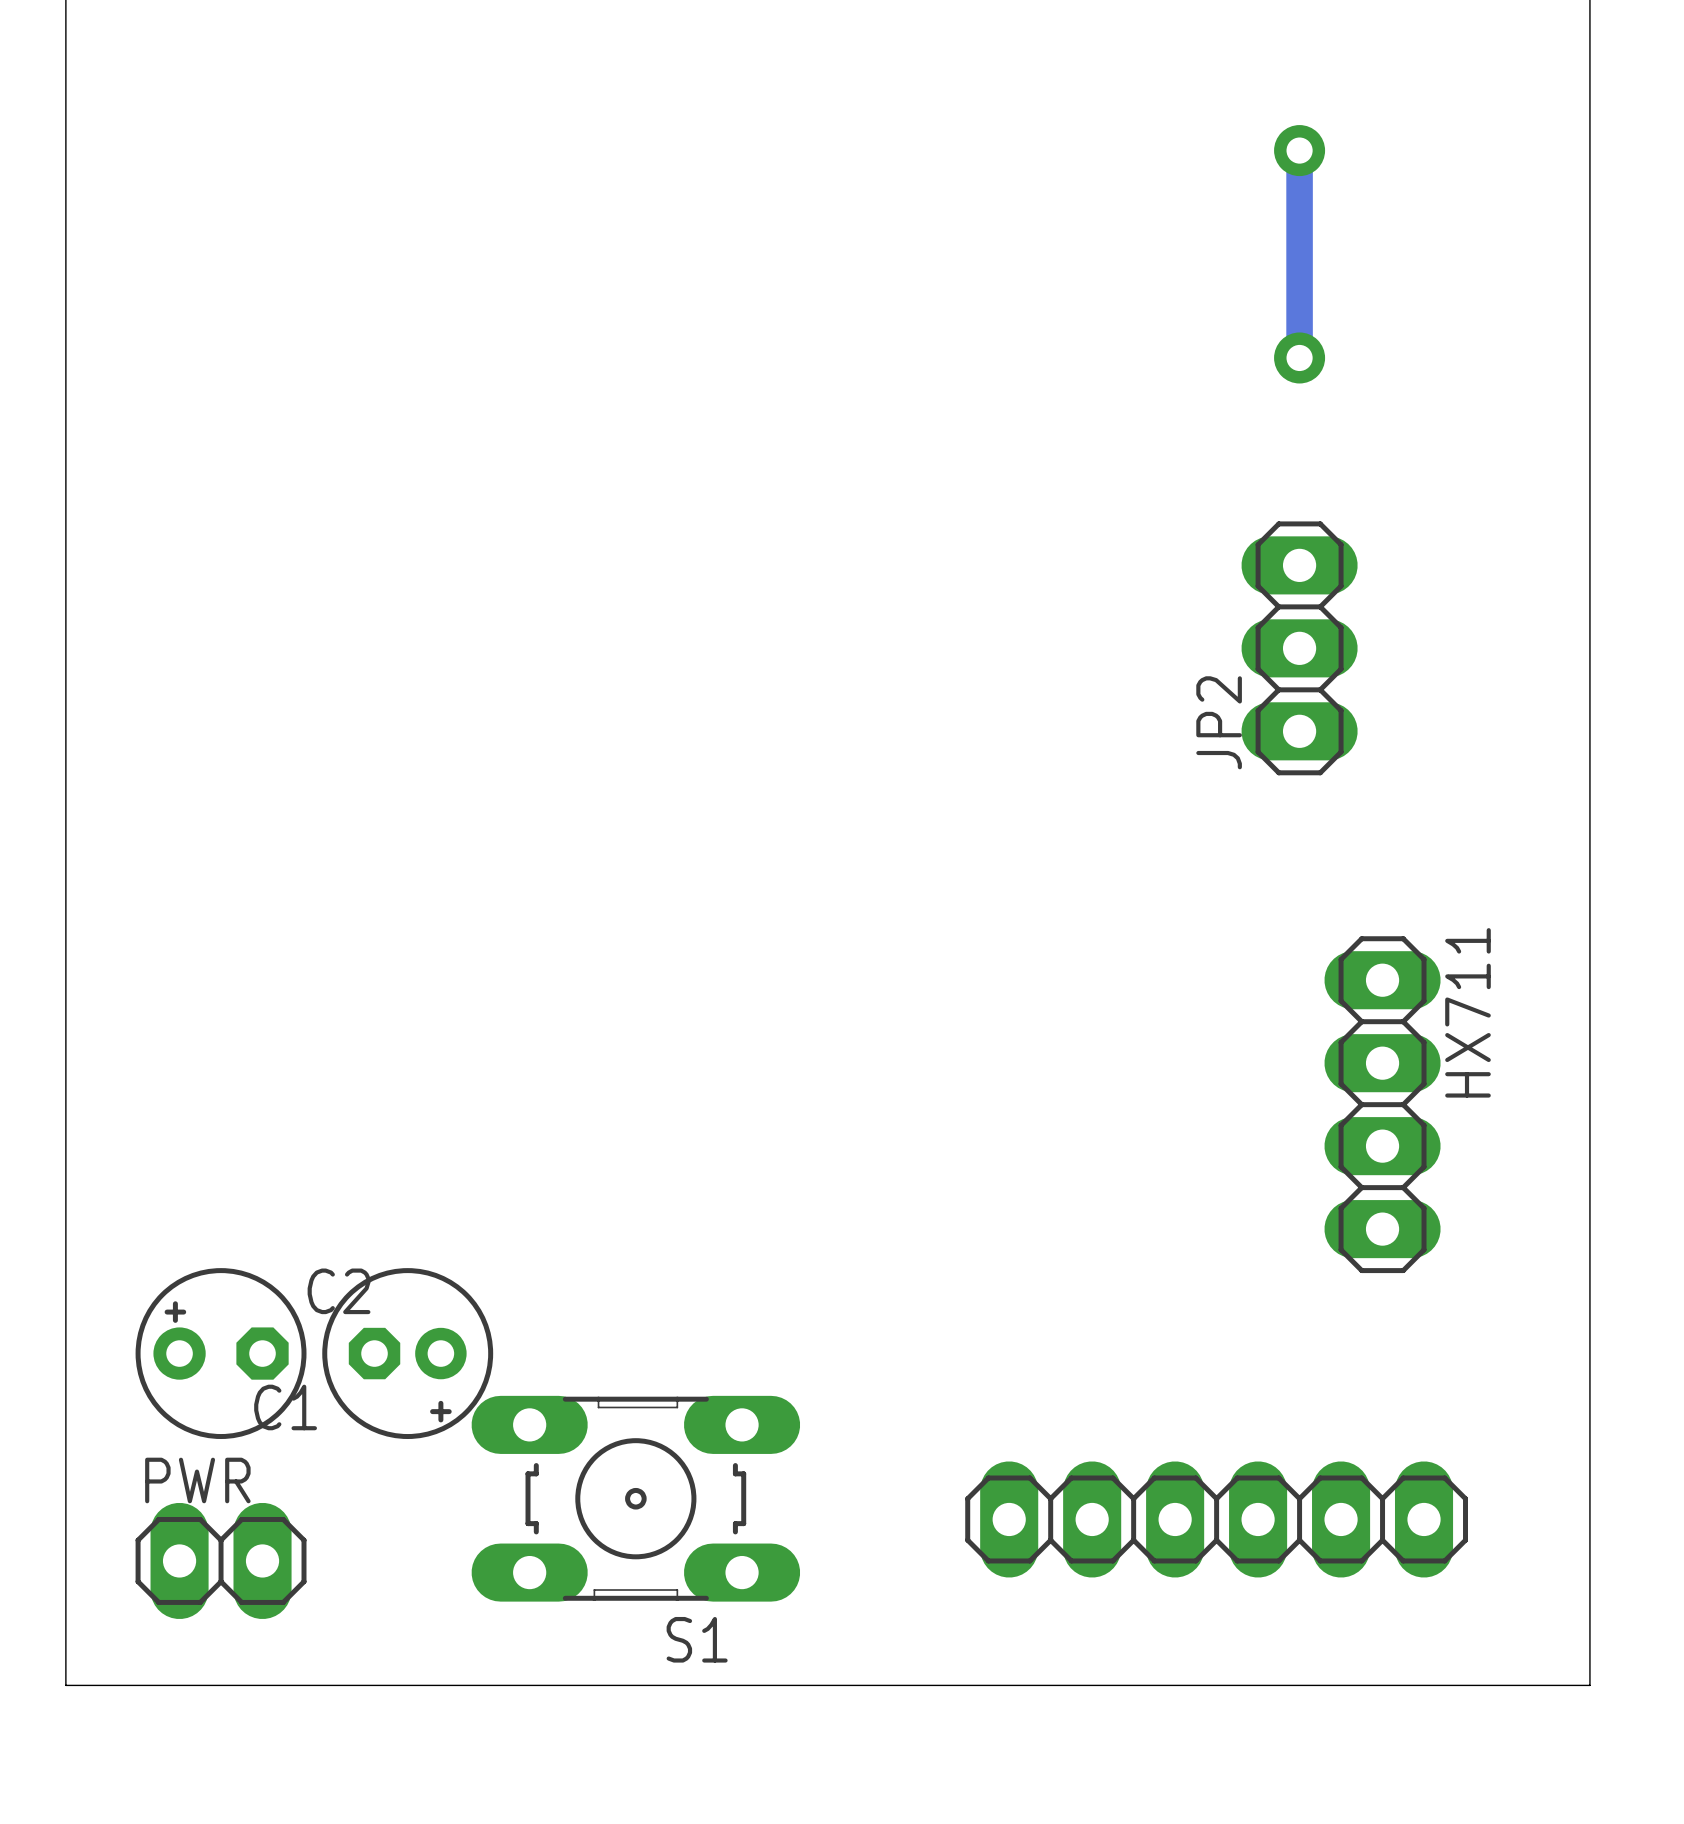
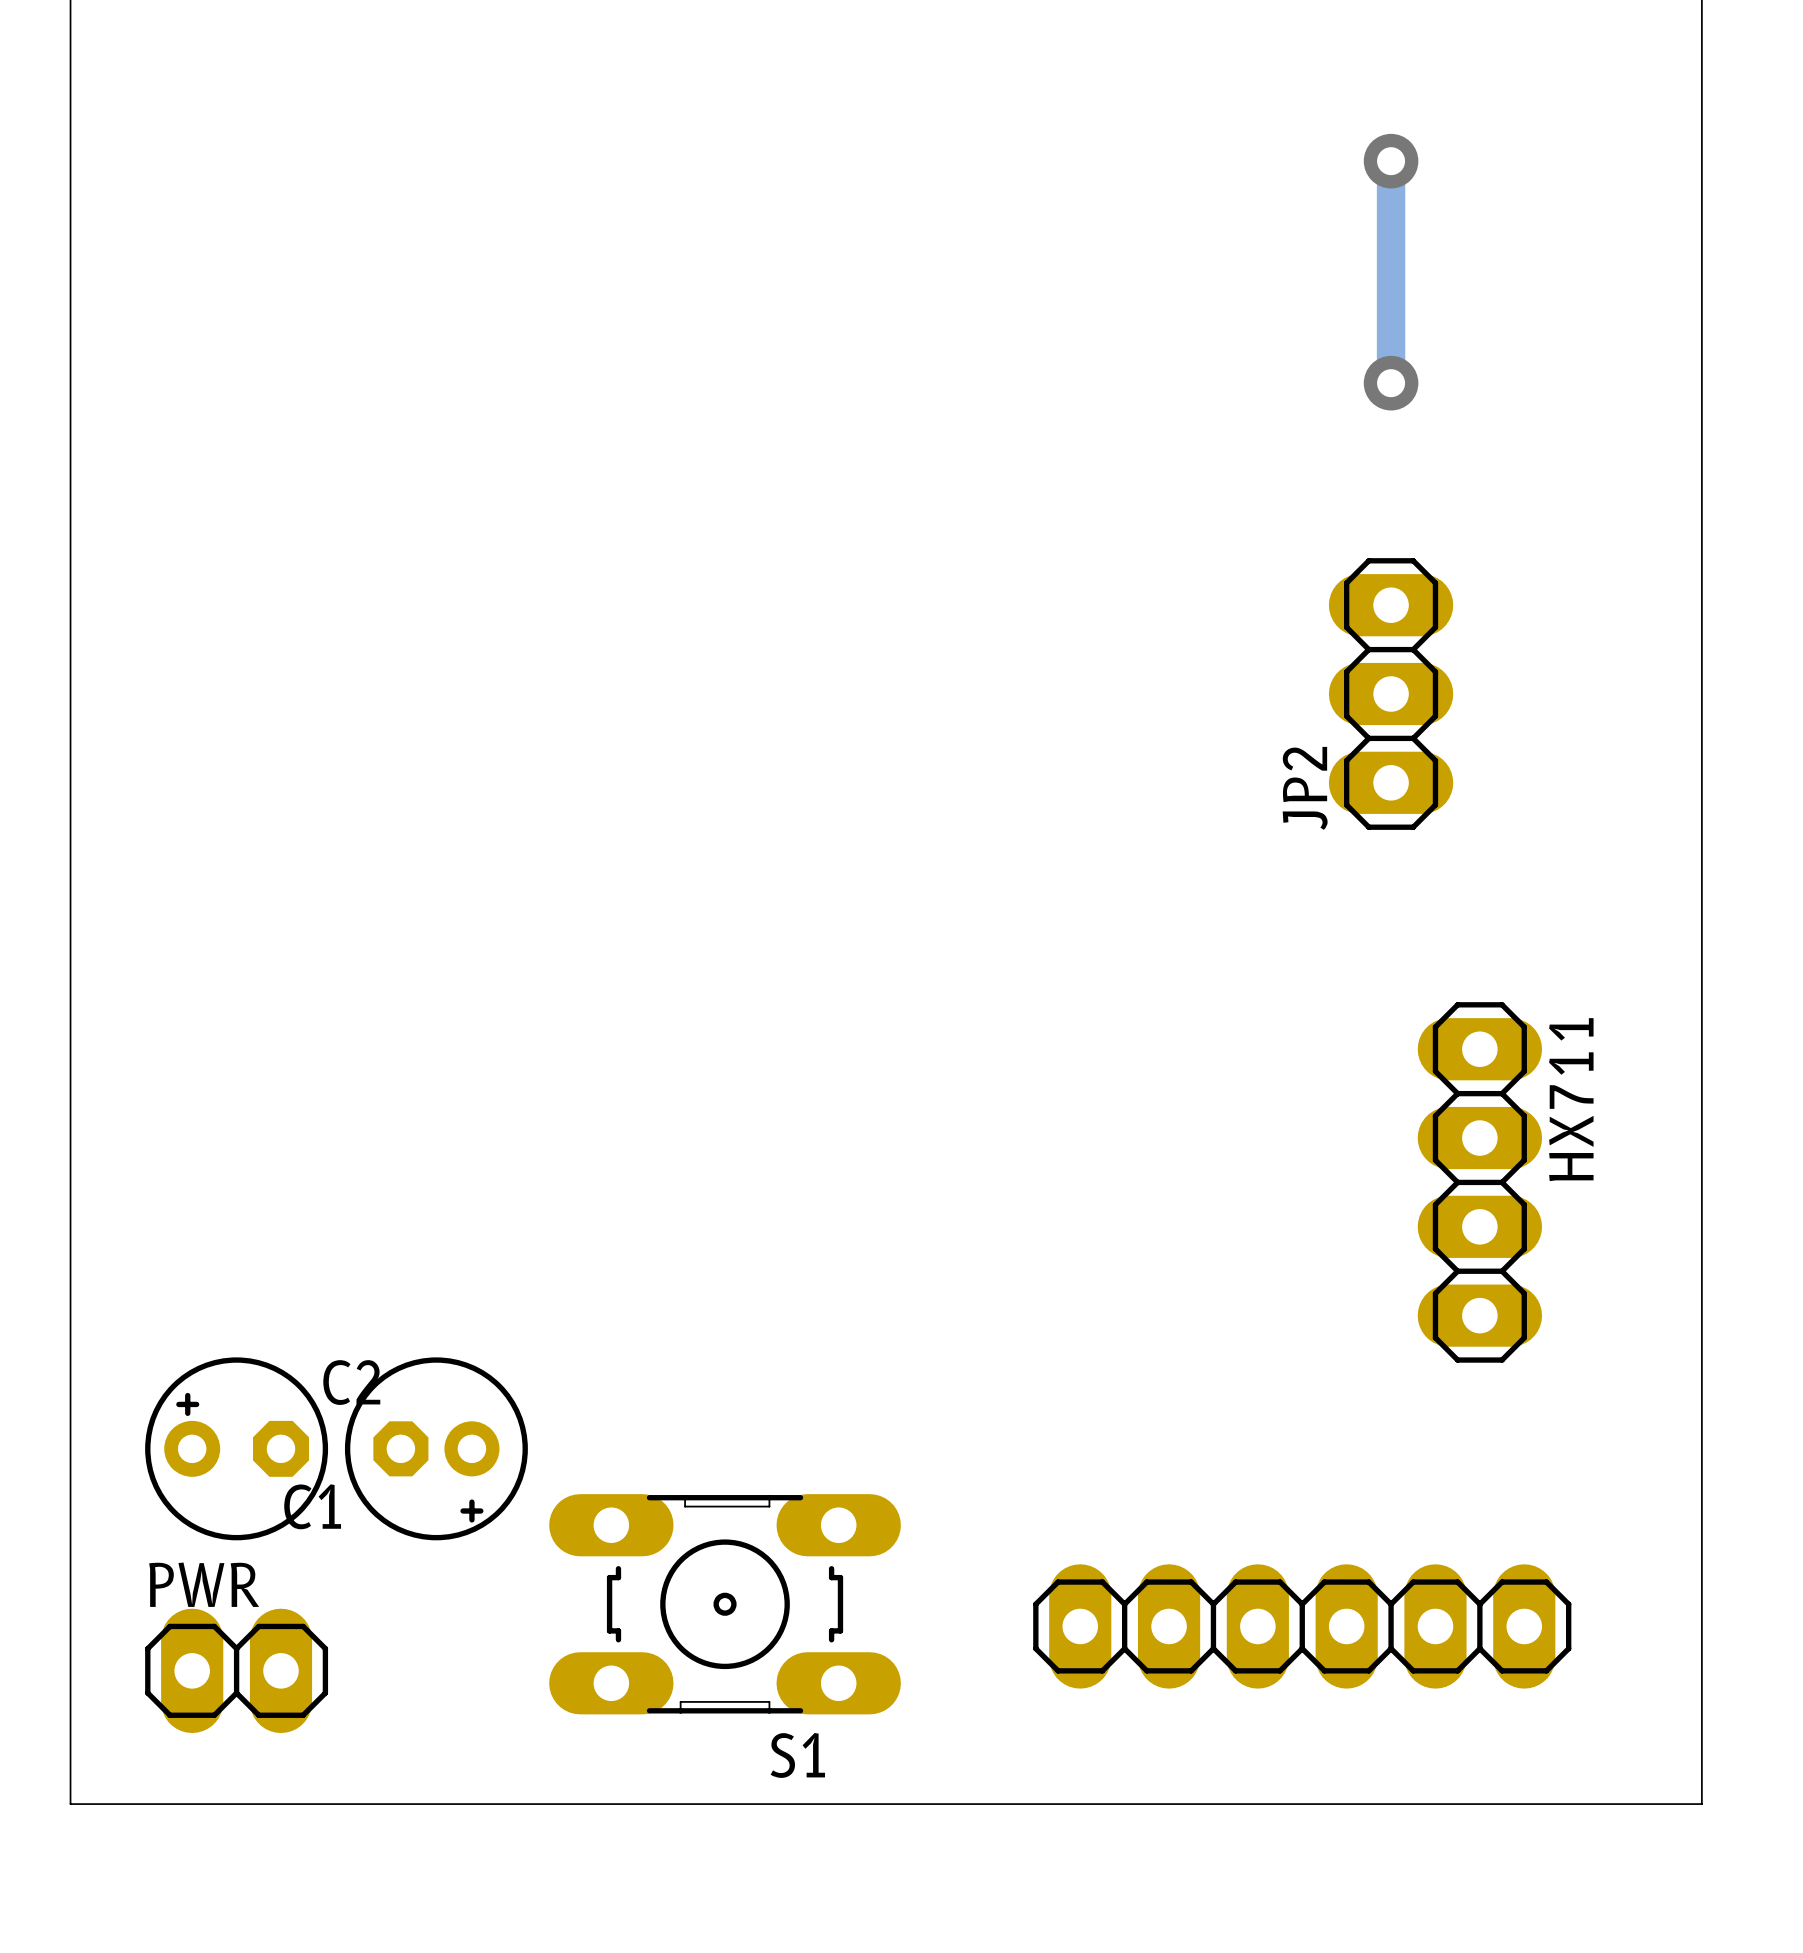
S1 position: (635, 1498) -> (725, 1604)

